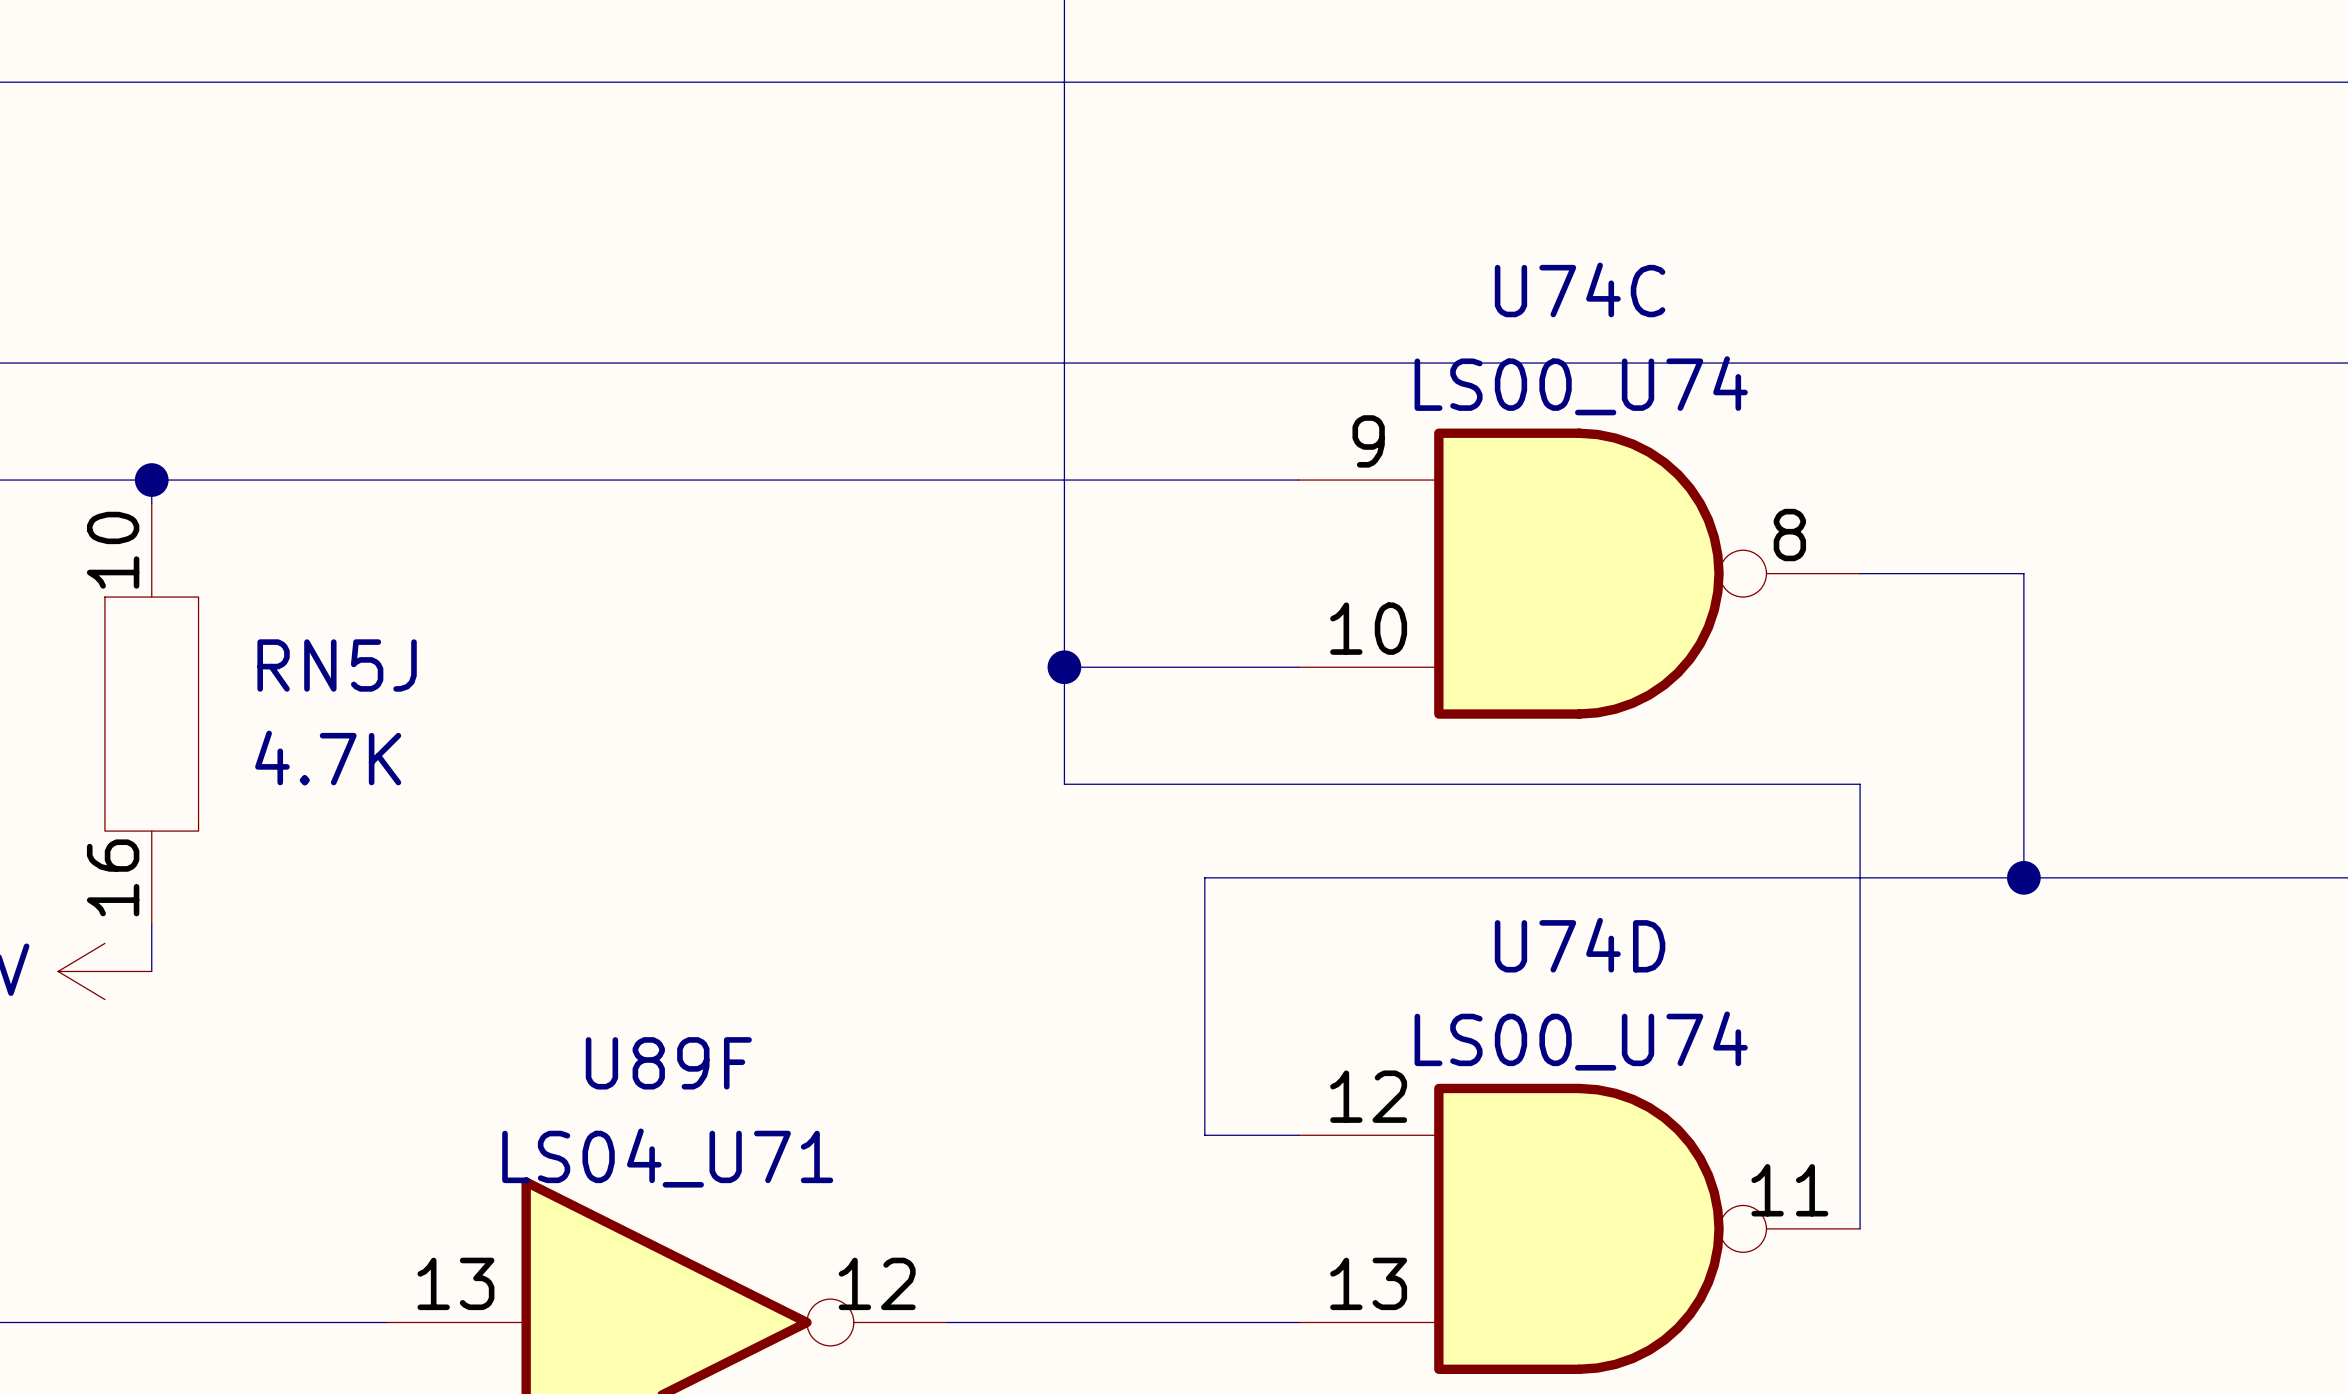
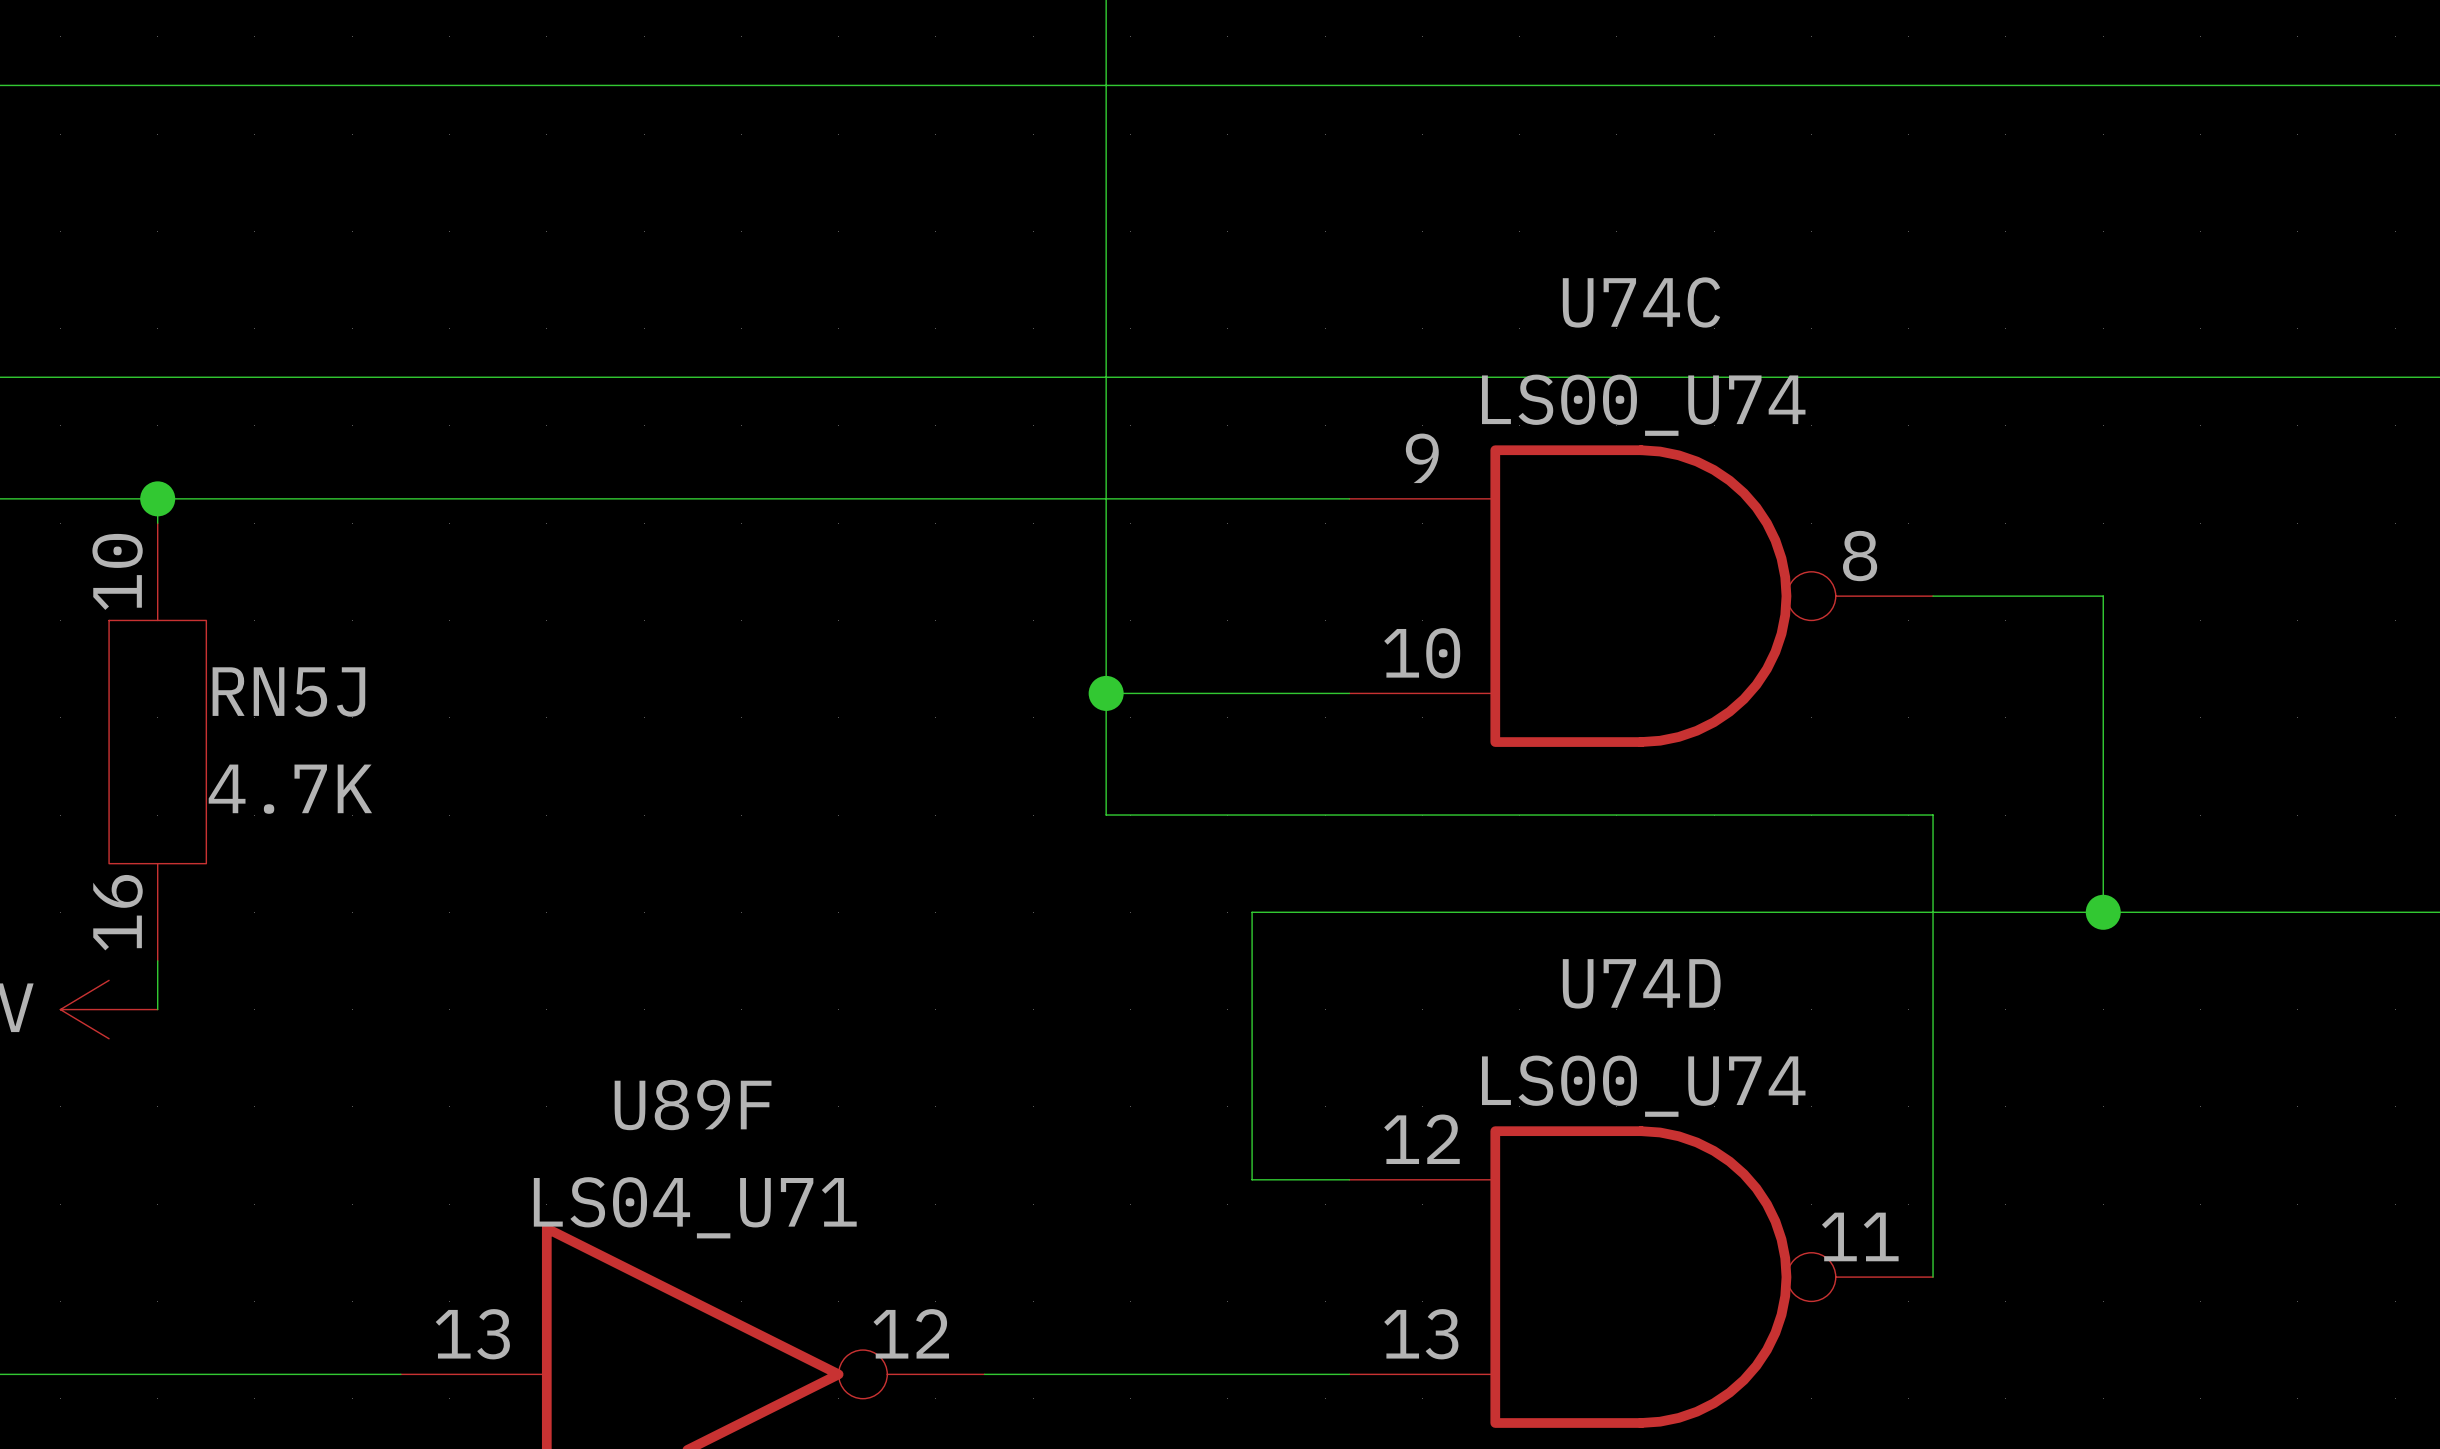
RN5J name position: RN5J (337, 665) -> RN5J (288, 692)
RN5J value position: 4.7K (328, 757) -> 4.7K (290, 789)

